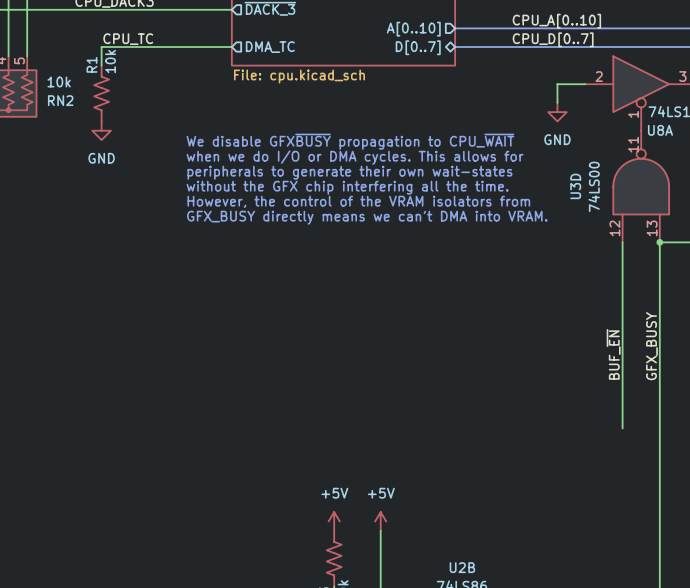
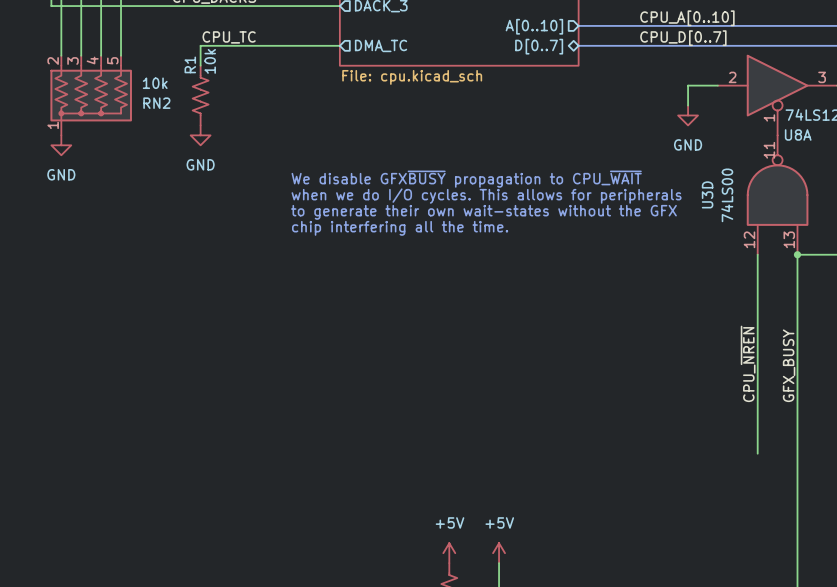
text: We disable GFX~{BUSY} propagation to CPU_~{WAIT} (350, 141) -> none
text: when we do I/O or DMA cycles. This allows for (355, 157) -> none
text: peripherals to generate their own wait-states (349, 172) -> We disable GFX~{BUSY} propagation to CPU_~{WAIT} (466, 179)
text: without the GFX chip interfering all the time. (347, 187) -> when we do I/O cycles. This allows for peripherals (486, 196)
text: However, the control of the VRAM isolators from (358, 201) -> to generate their own wait-states without the GFX (483, 212)
text: GFX_BUSY directly means we can't DMA into VRAM. (367, 217) -> chip interfering all the time. (400, 228)
label: BUF_~{EN} (613, 354) -> CPU_~{NREN} (748, 363)

